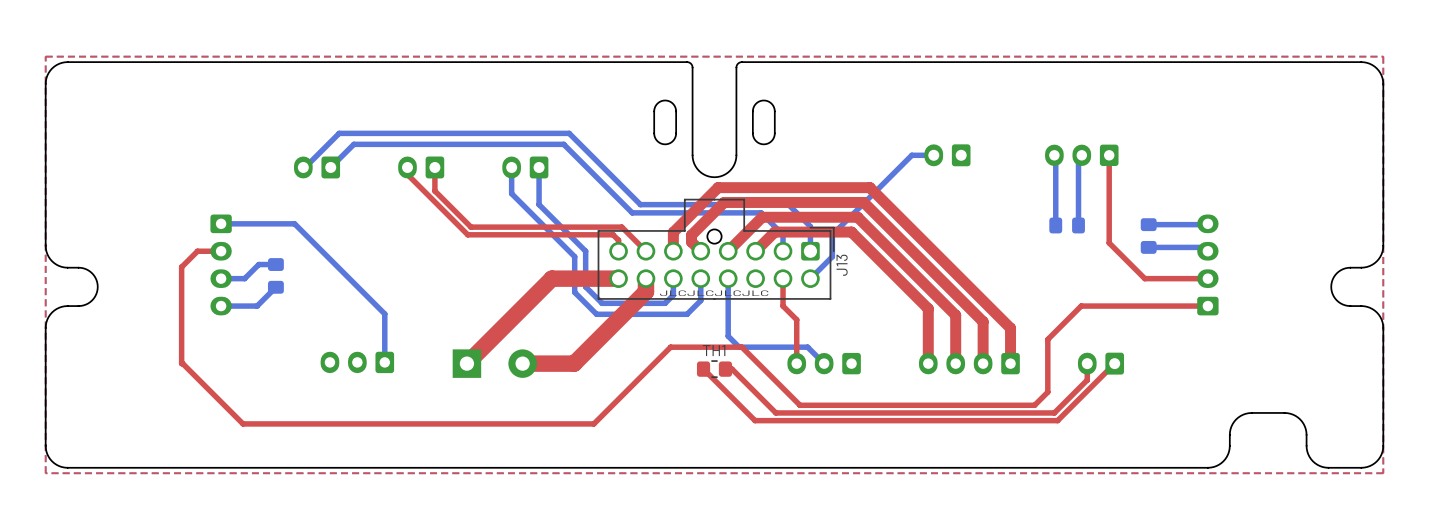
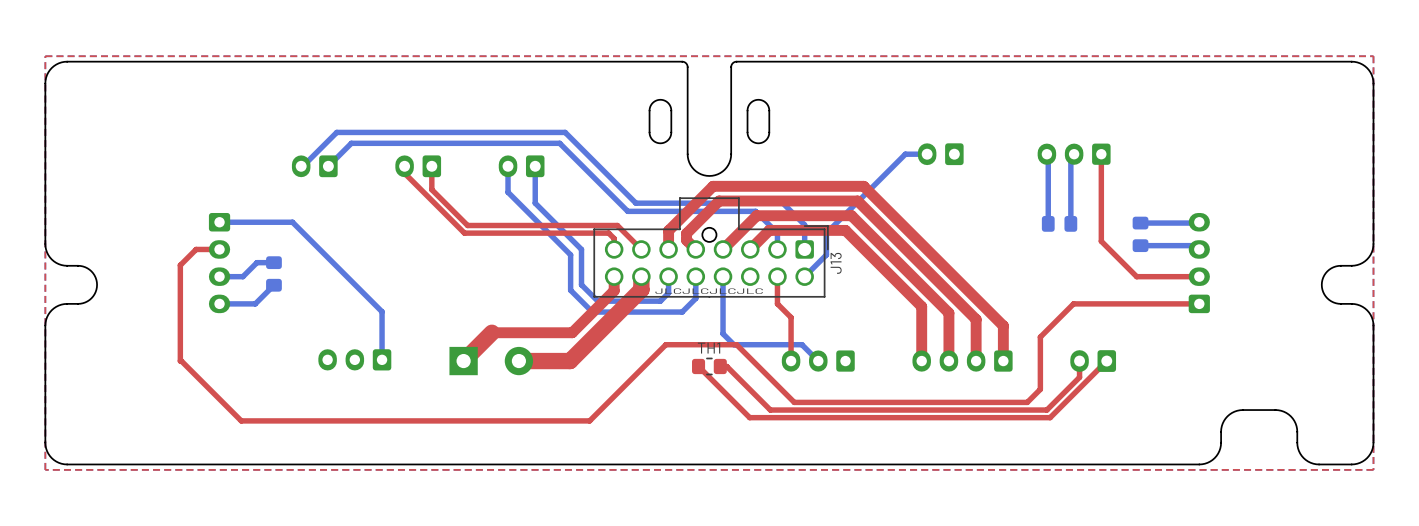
top track: (618, 278) (551, 278) (495, 335) -> (614, 276) (614, 290) (572, 332) (491, 332)

